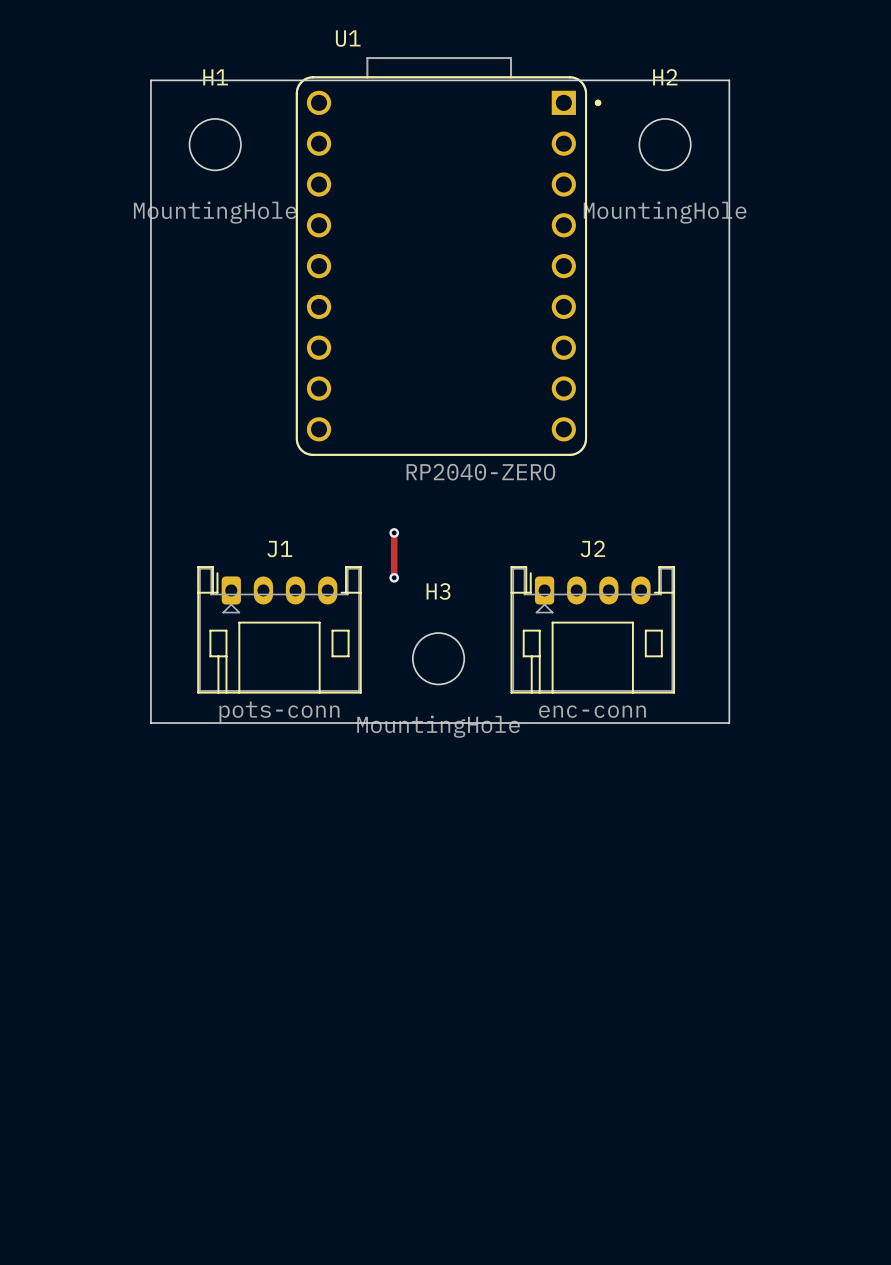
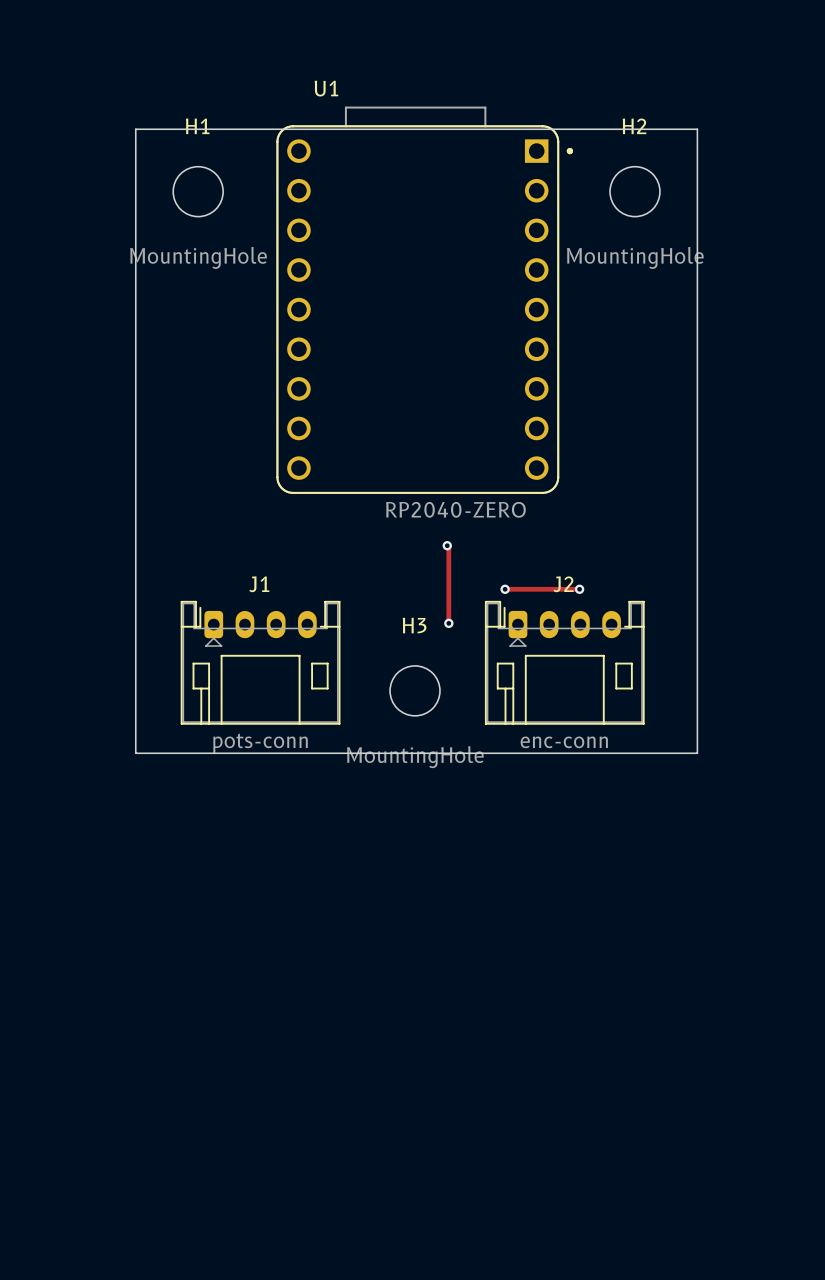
track: none -> (447, 545) (448, 547) (448, 623)
via: none -> (447, 545)
track: (394, 532) (394, 577) -> none
via: (394, 532) -> none
track: none -> (505, 589) (579, 589)
via: none -> (505, 589)
via: none -> (579, 589)
via: (394, 577) -> none
via: none -> (448, 623)

